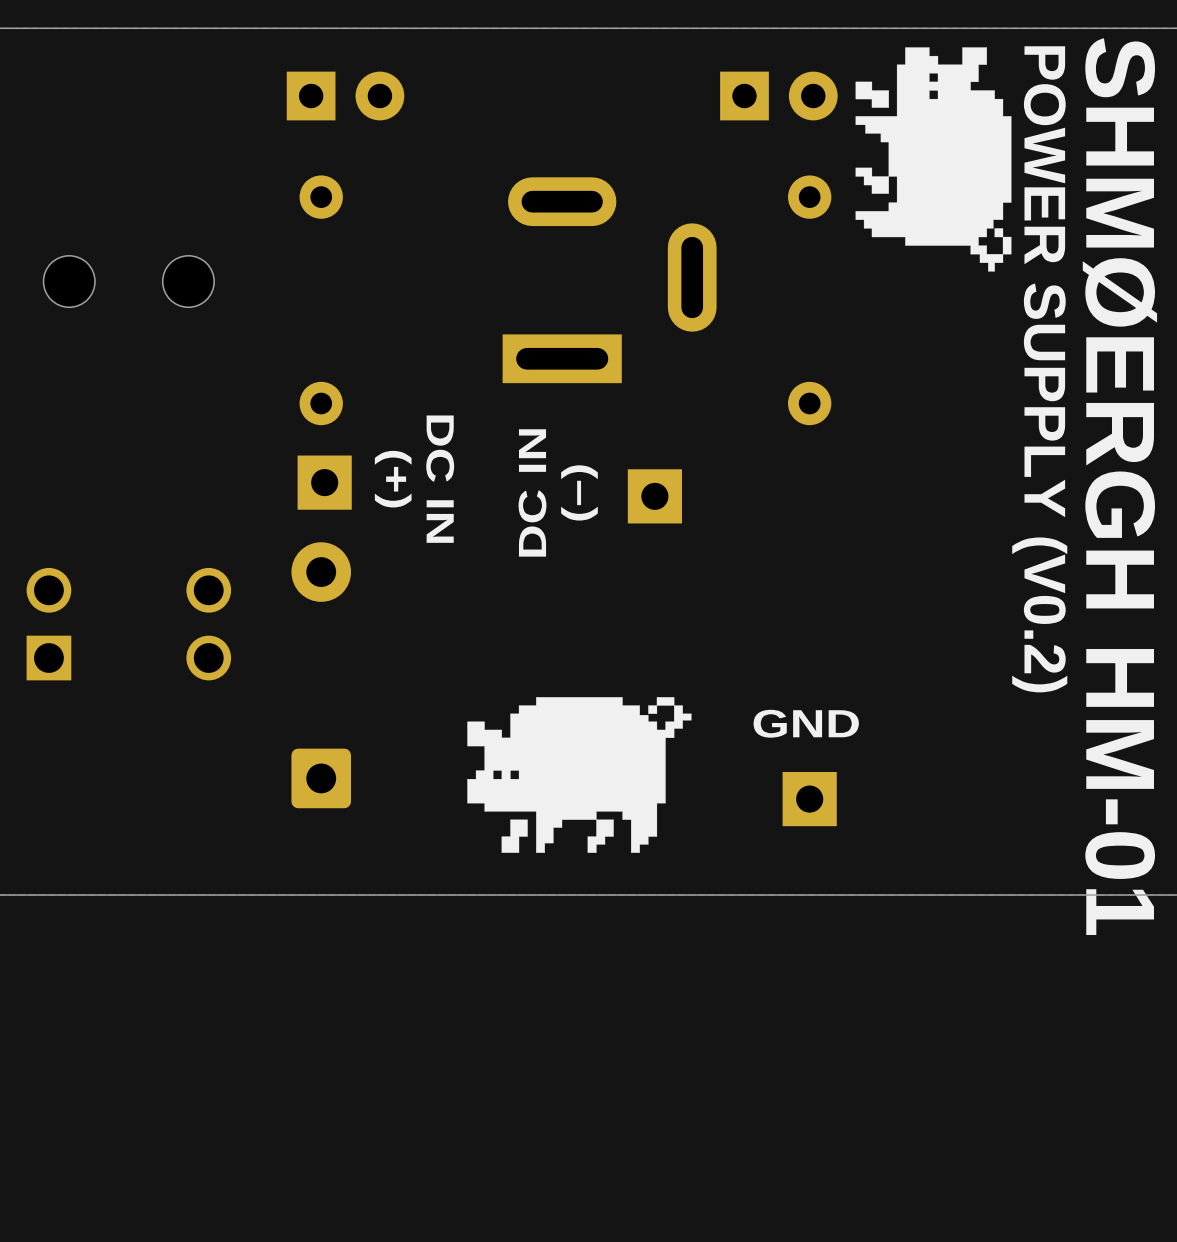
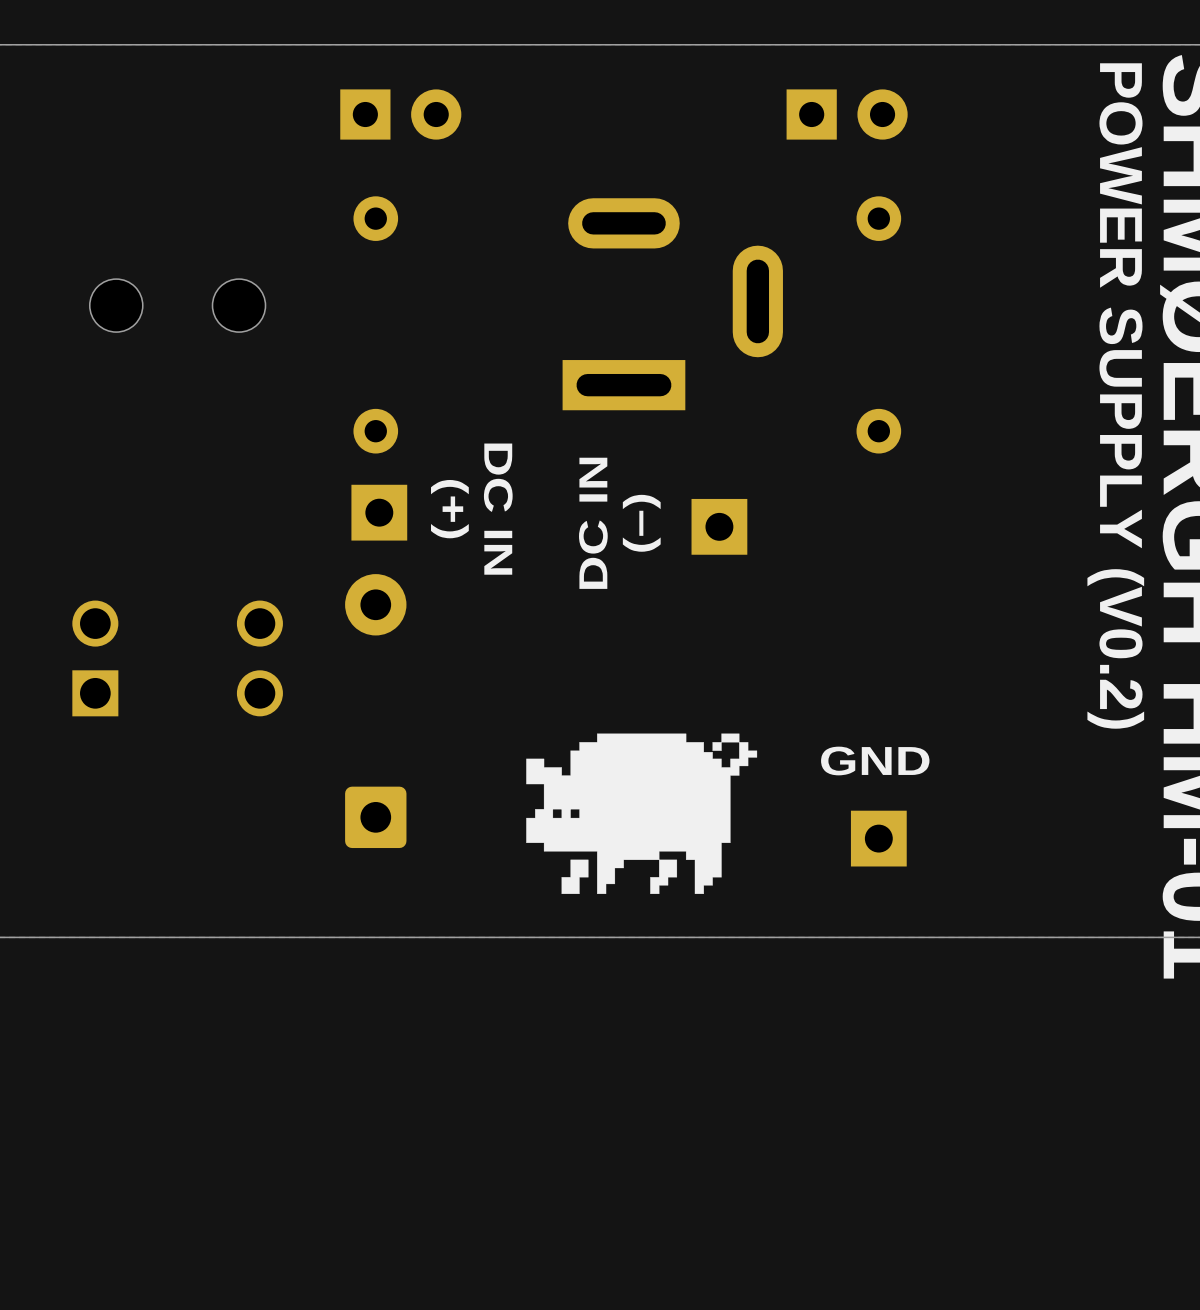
drawing: [855, 47, 1012, 272] -> none

